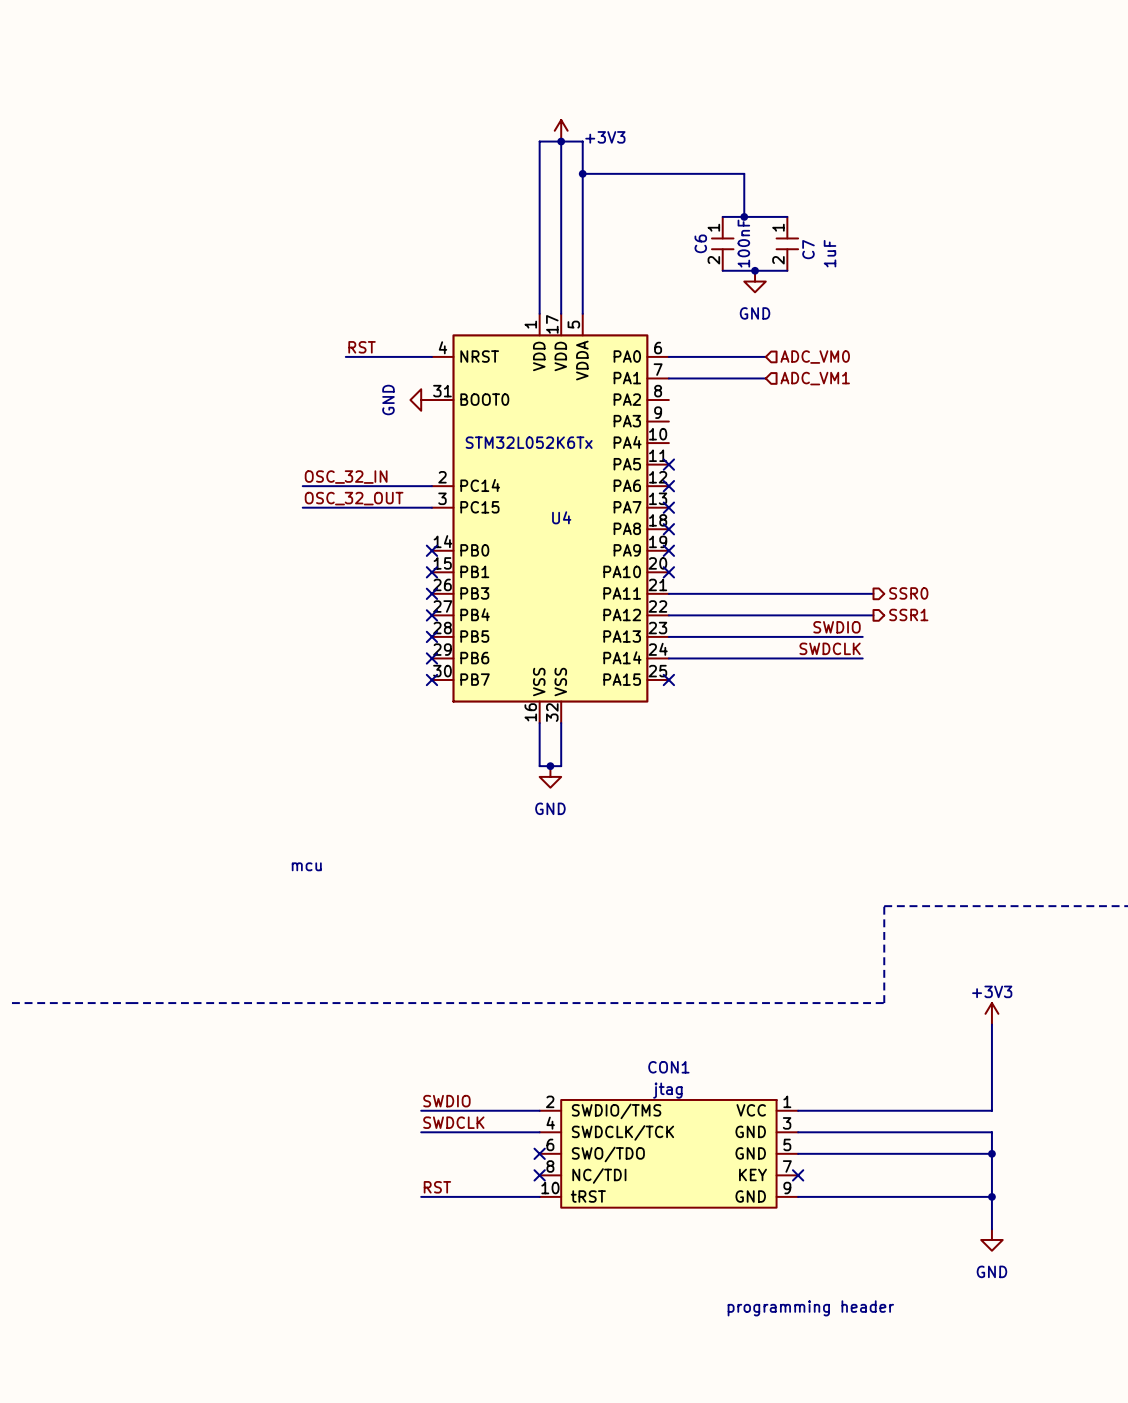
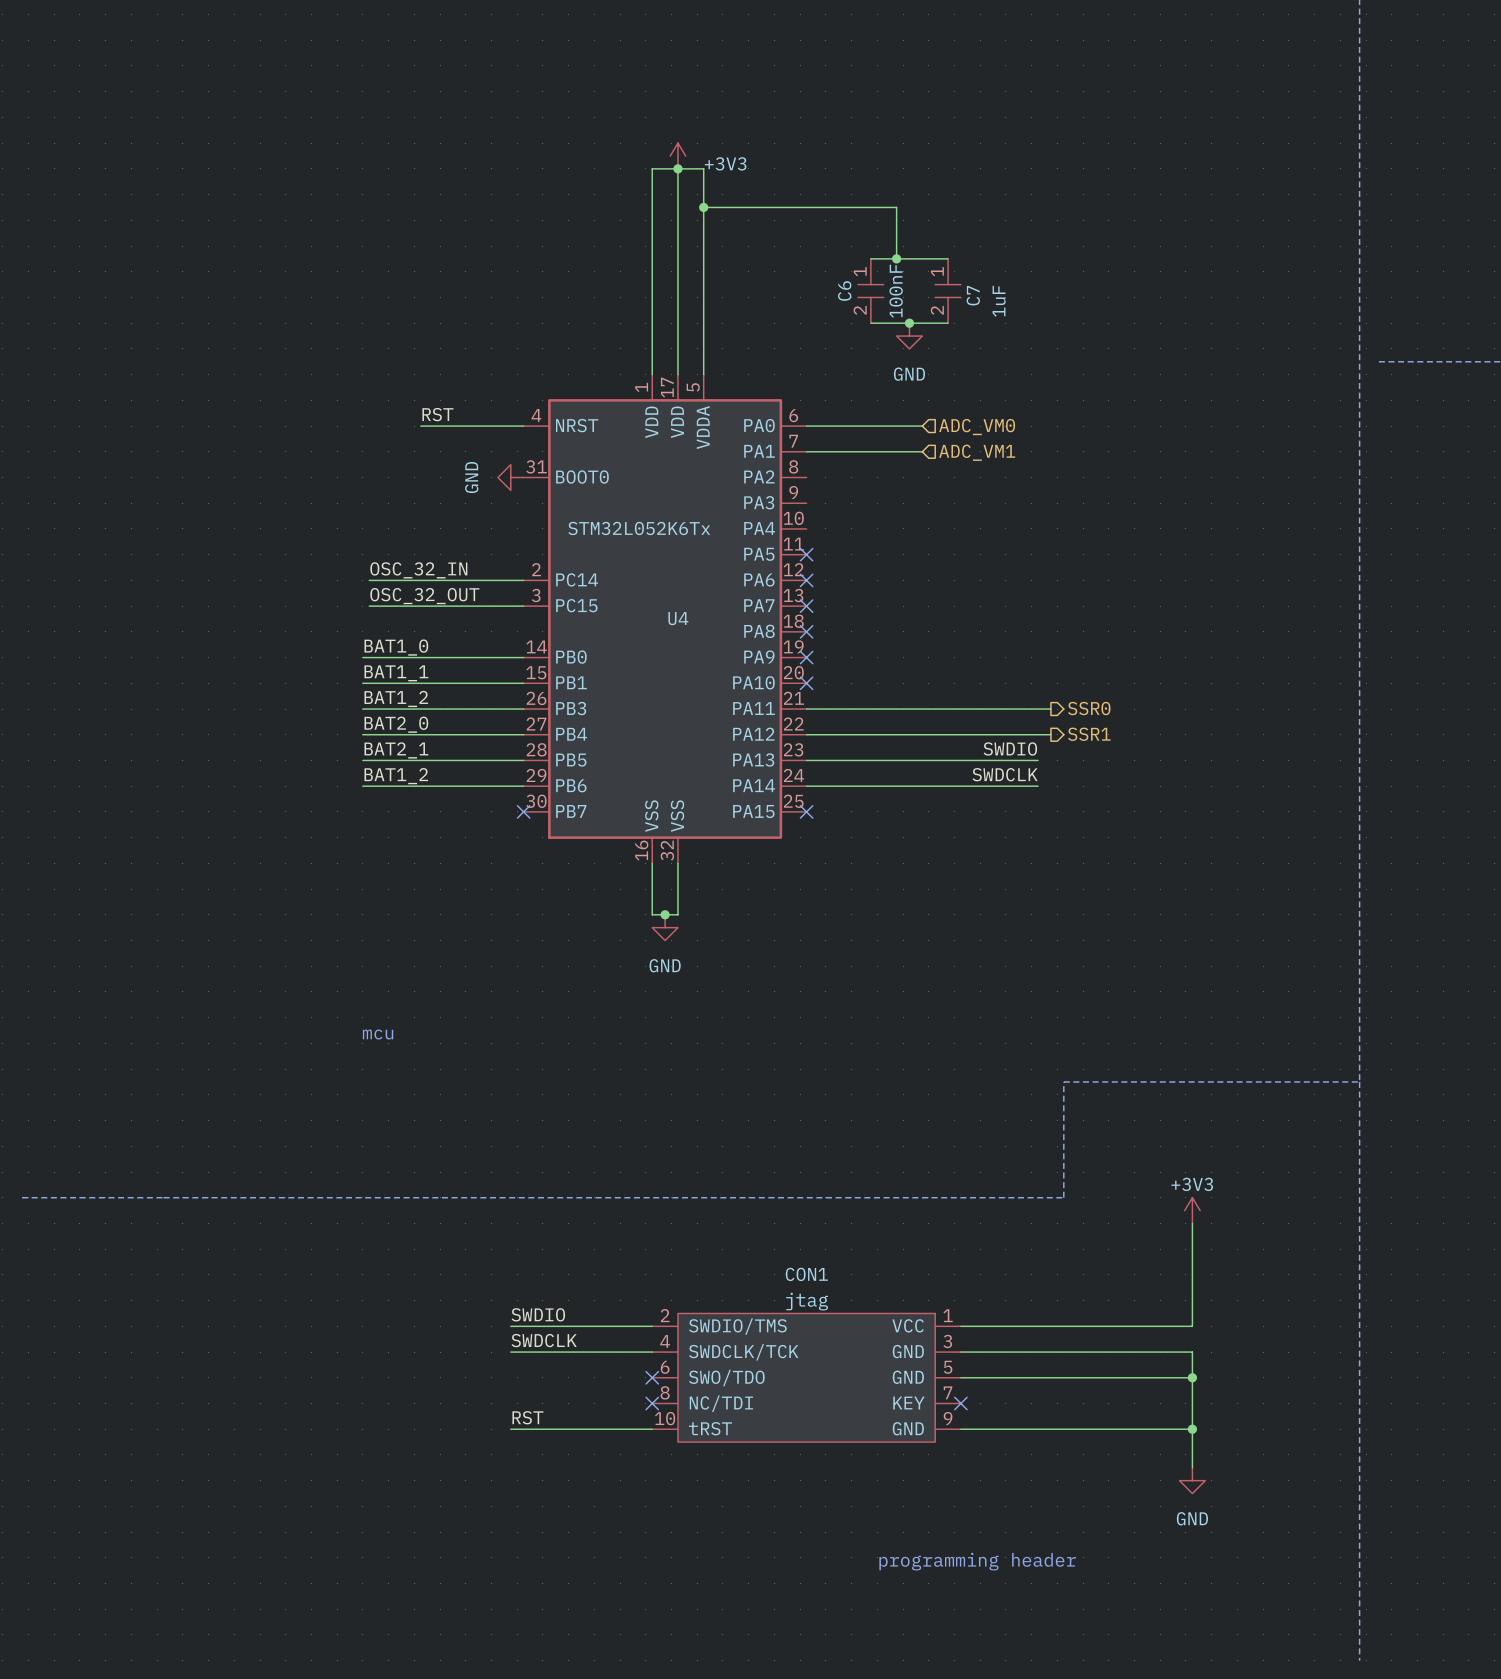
label: none -> BAT1_0 (396, 647)
wire: none -> (362, 657) (523, 657)
no-connect mark: (431, 550) -> none
label: none -> BAT1_1 (396, 673)
wire: none -> (362, 683) (523, 683)
no-connect mark: (431, 572) -> none
label: none -> BAT1_2 (396, 698)
wire: none -> (362, 709) (523, 709)
no-connect mark: (431, 593) -> none
label: none -> BAT2_0 (396, 724)
wire: none -> (362, 734) (523, 734)
no-connect mark: (431, 615) -> none
label: none -> BAT2_1 (396, 750)
wire: none -> (362, 760) (523, 760)
no-connect mark: (431, 636) -> none
label: none -> BAT1_2 (396, 776)
wire: none -> (362, 786) (523, 786)
no-connect mark: (431, 658) -> none

